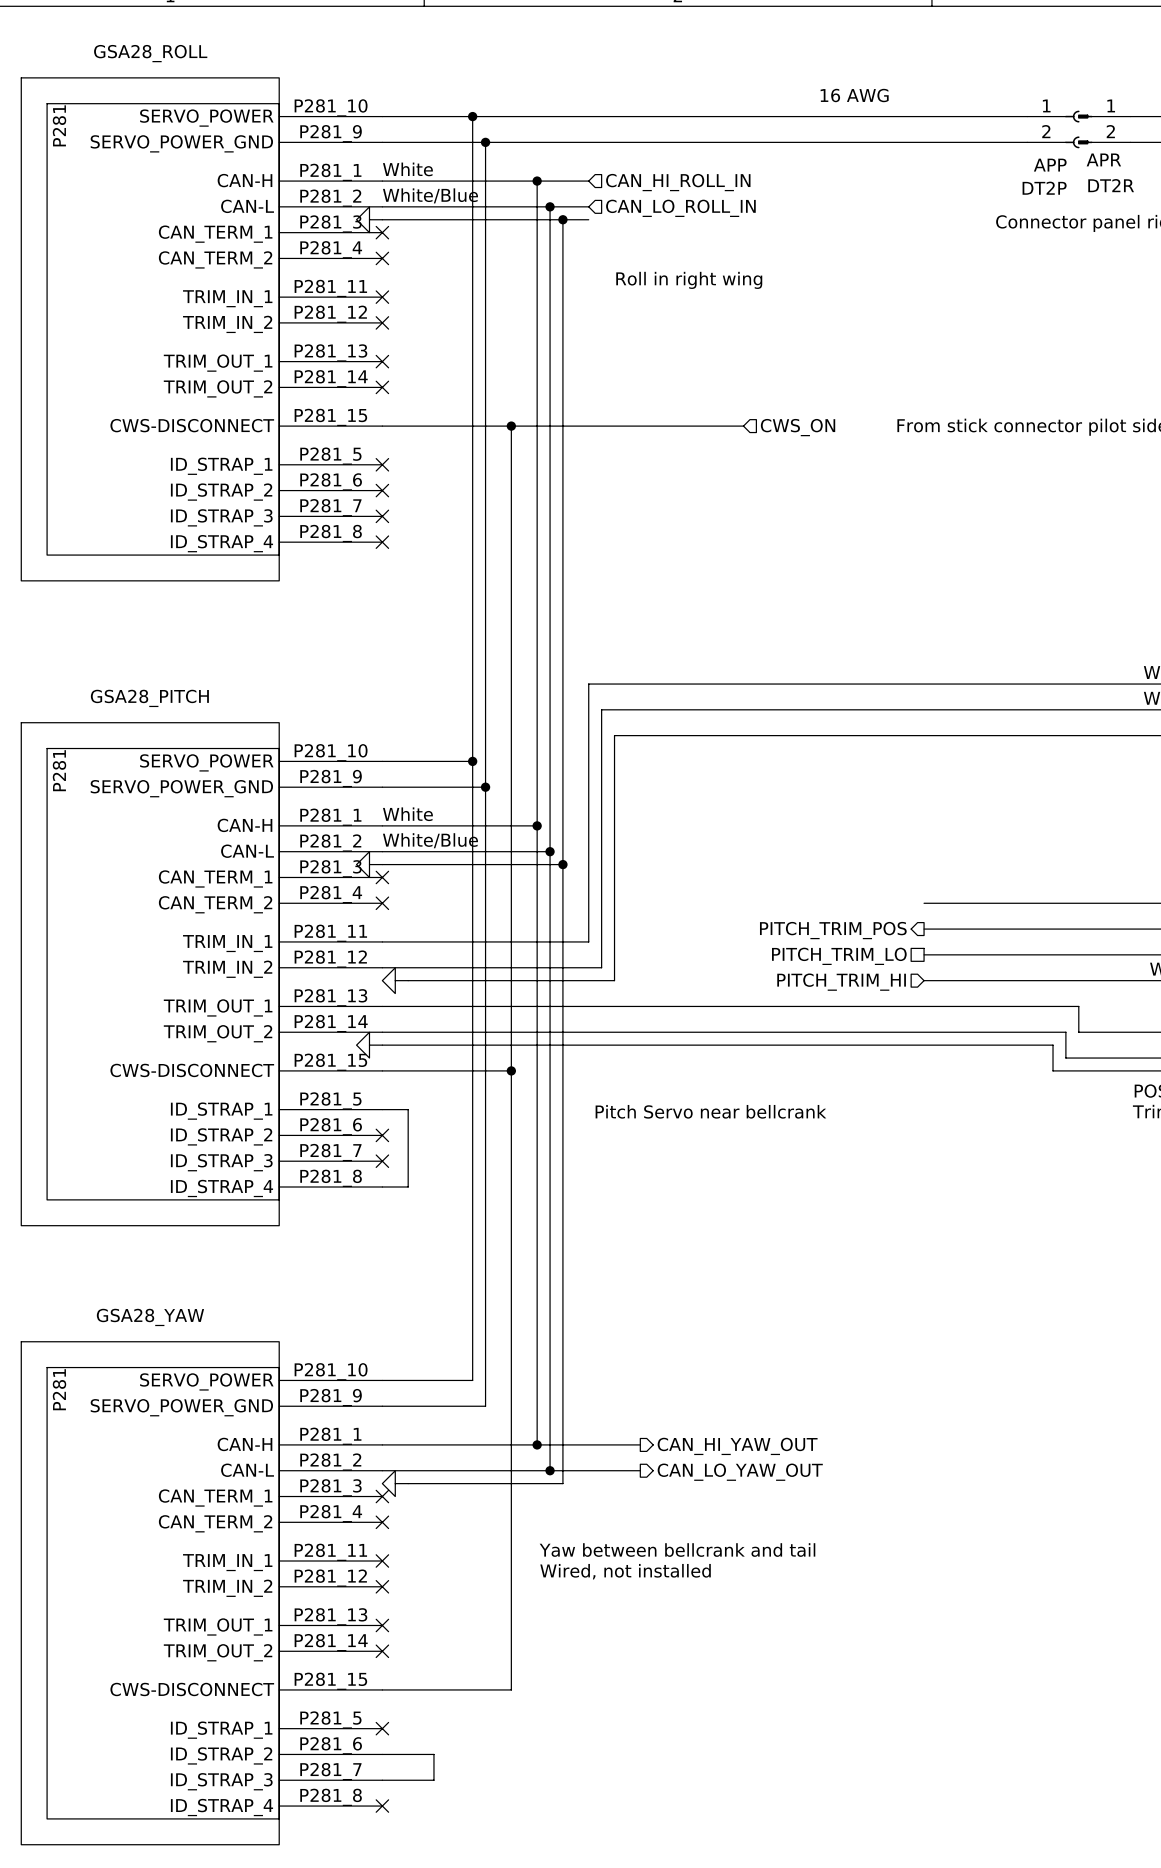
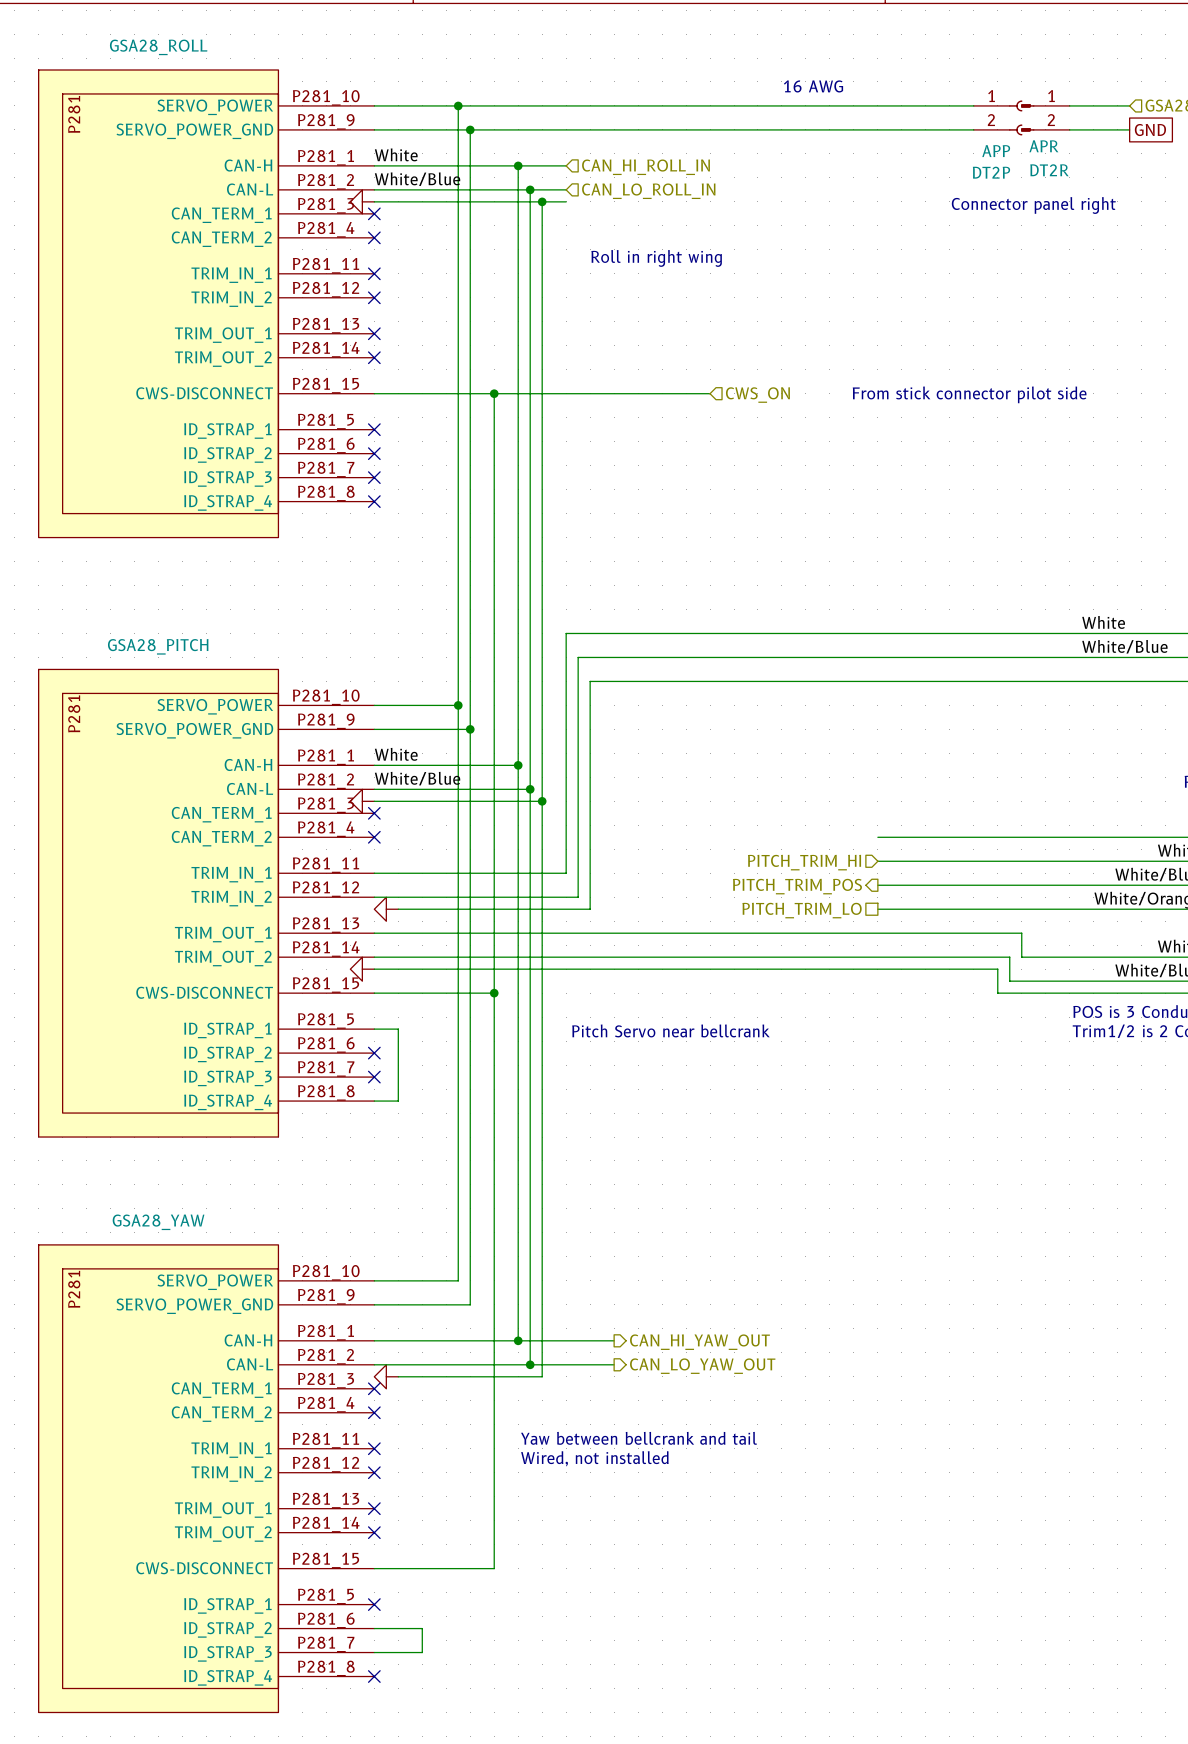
hierarchical label shape: output (833, 930) -> input (804, 862)
hierarchical label: PITCH_TRIM_POS (833, 930) -> PITCH_TRIM_HI (804, 862)
hierarchical label shape: passive (839, 956) -> output (797, 886)
hierarchical label: PITCH_TRIM_LO (839, 956) -> PITCH_TRIM_POS (797, 886)
hierarchical label shape: input (841, 982) -> passive (802, 910)
hierarchical label: PITCH_TRIM_HI (841, 982) -> PITCH_TRIM_LO (802, 910)

